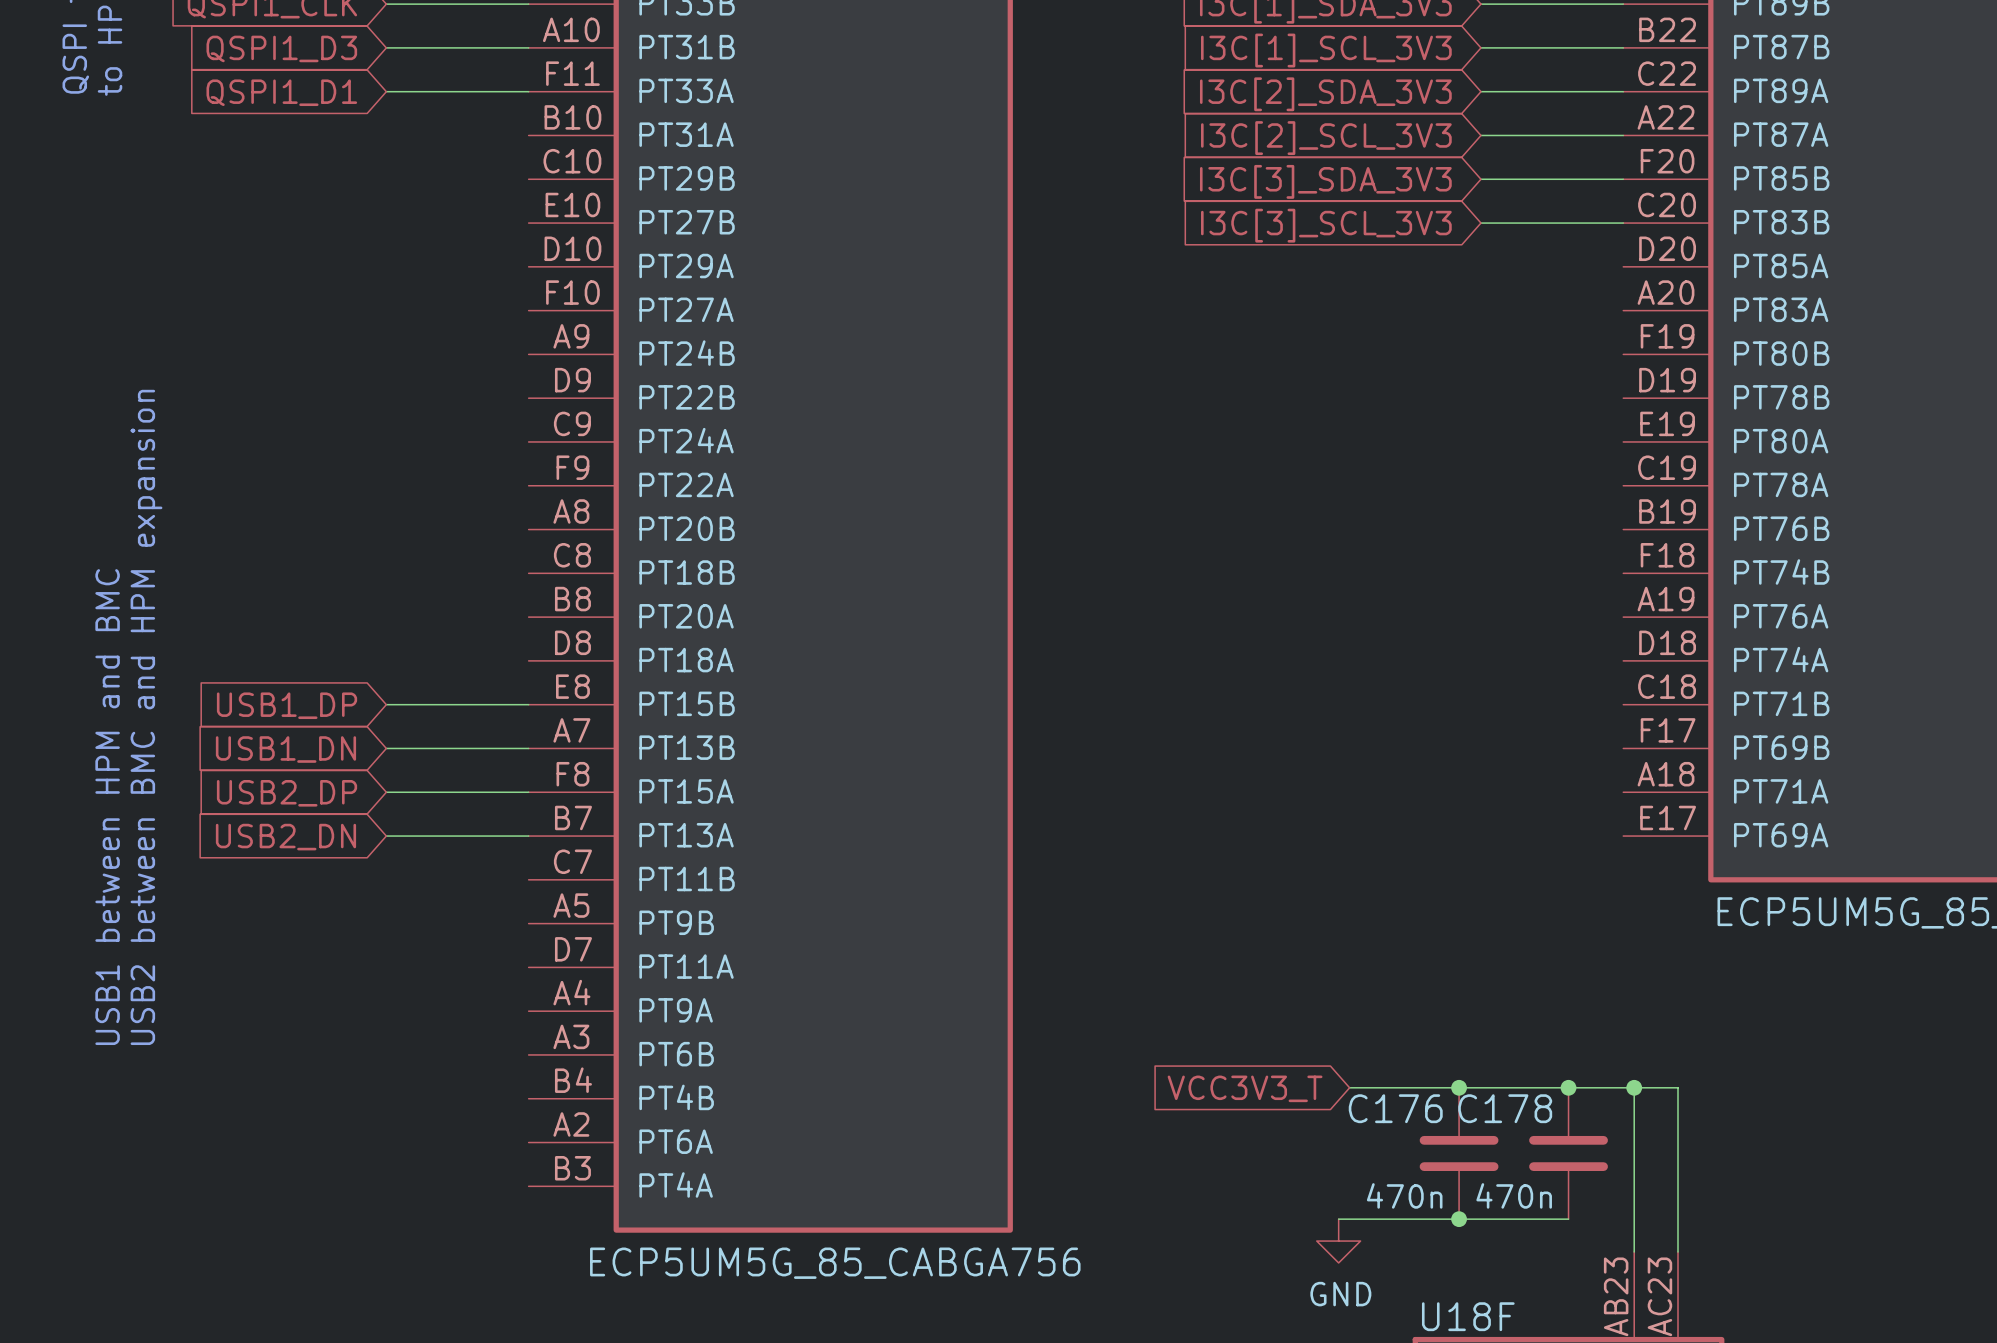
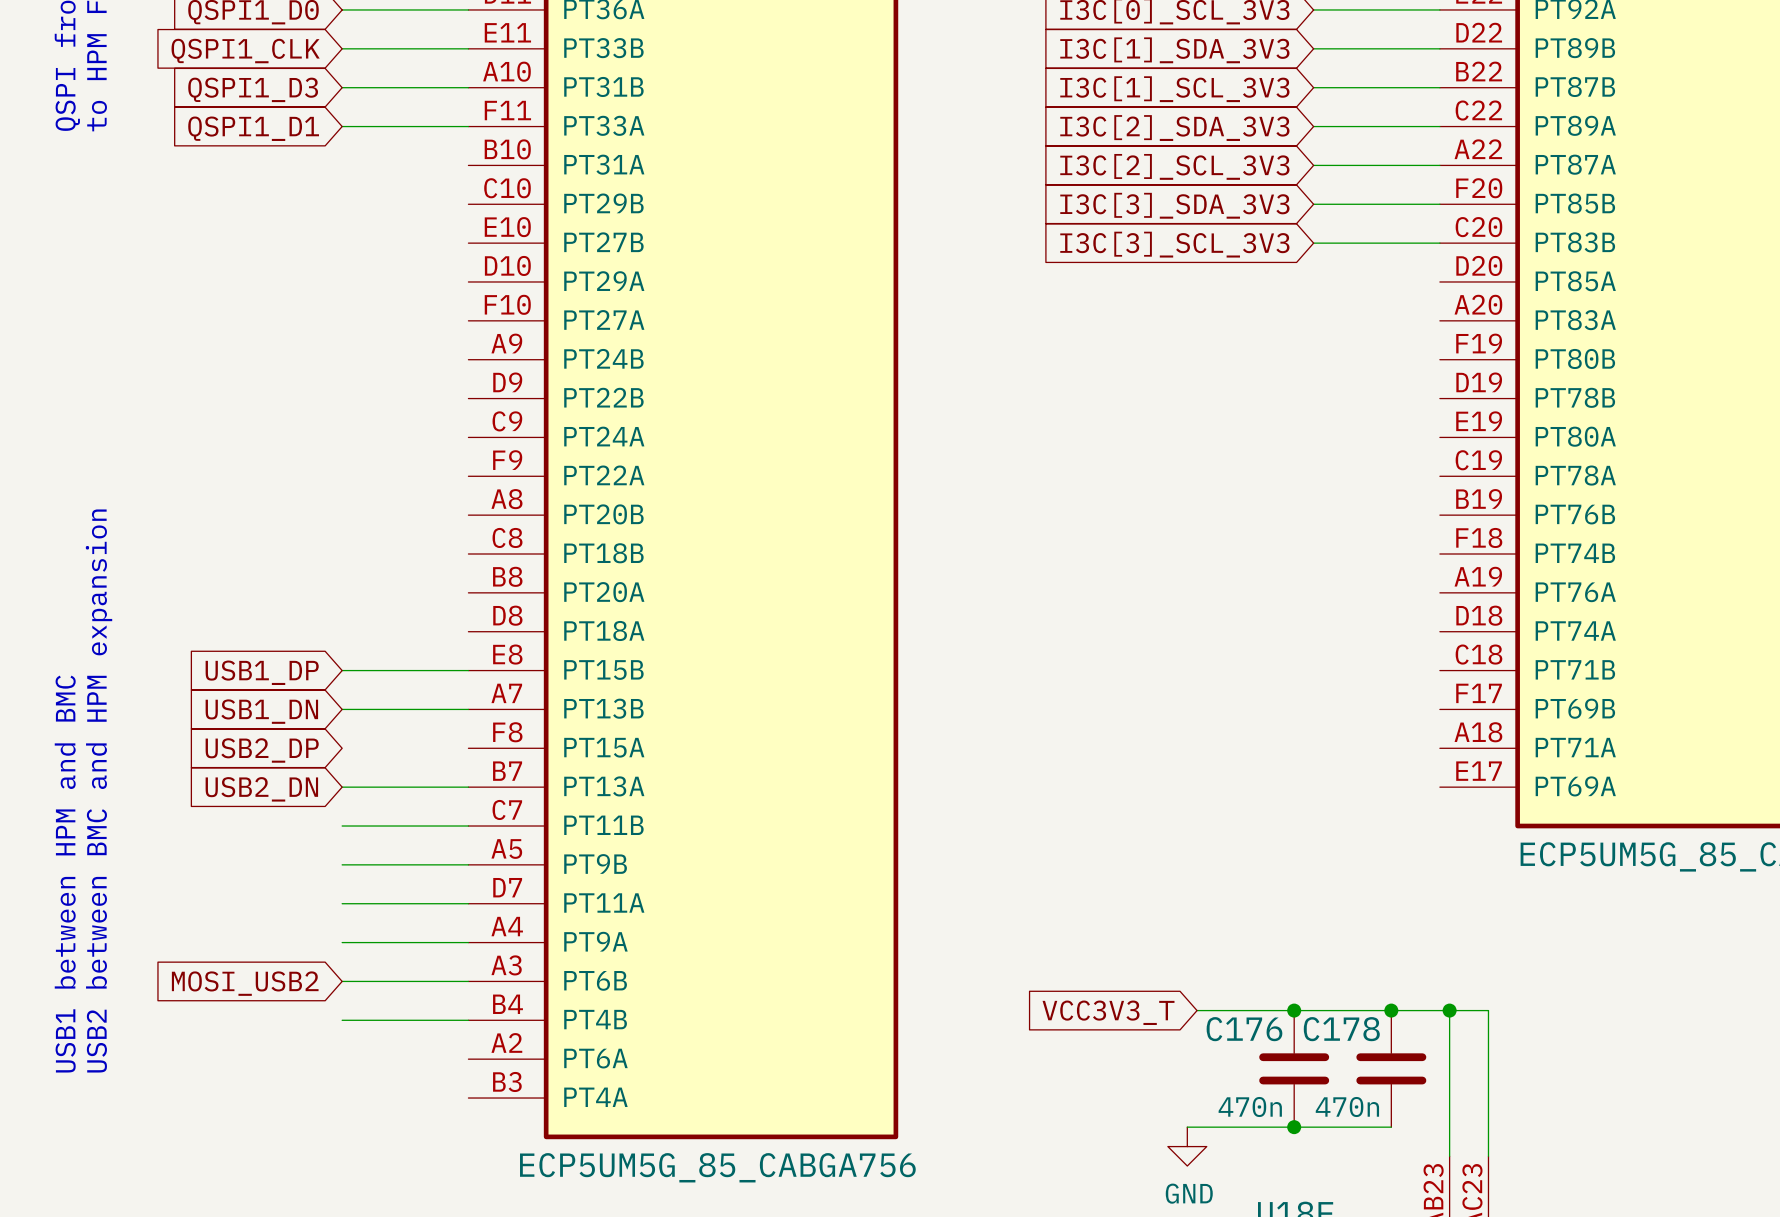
text position: USB2 between BMC and HPM expansion (146, 717) -> USB2 between BMC and HPM expansion (99, 790)
wire: (386, 792) (528, 792) -> (342, 826) (468, 826)
text position: USB1 between HPM and BMC (107, 807) -> USB1 between HPM and BMC (65, 874)
wire: none -> (342, 864) (468, 864)
wire: none -> (342, 903) (468, 903)
wire: none -> (342, 942) (468, 942)
wire: none -> (342, 981) (468, 981)
global label: none -> MOSI_USB2 (245, 983)
wire: none -> (342, 1020) (468, 1020)

